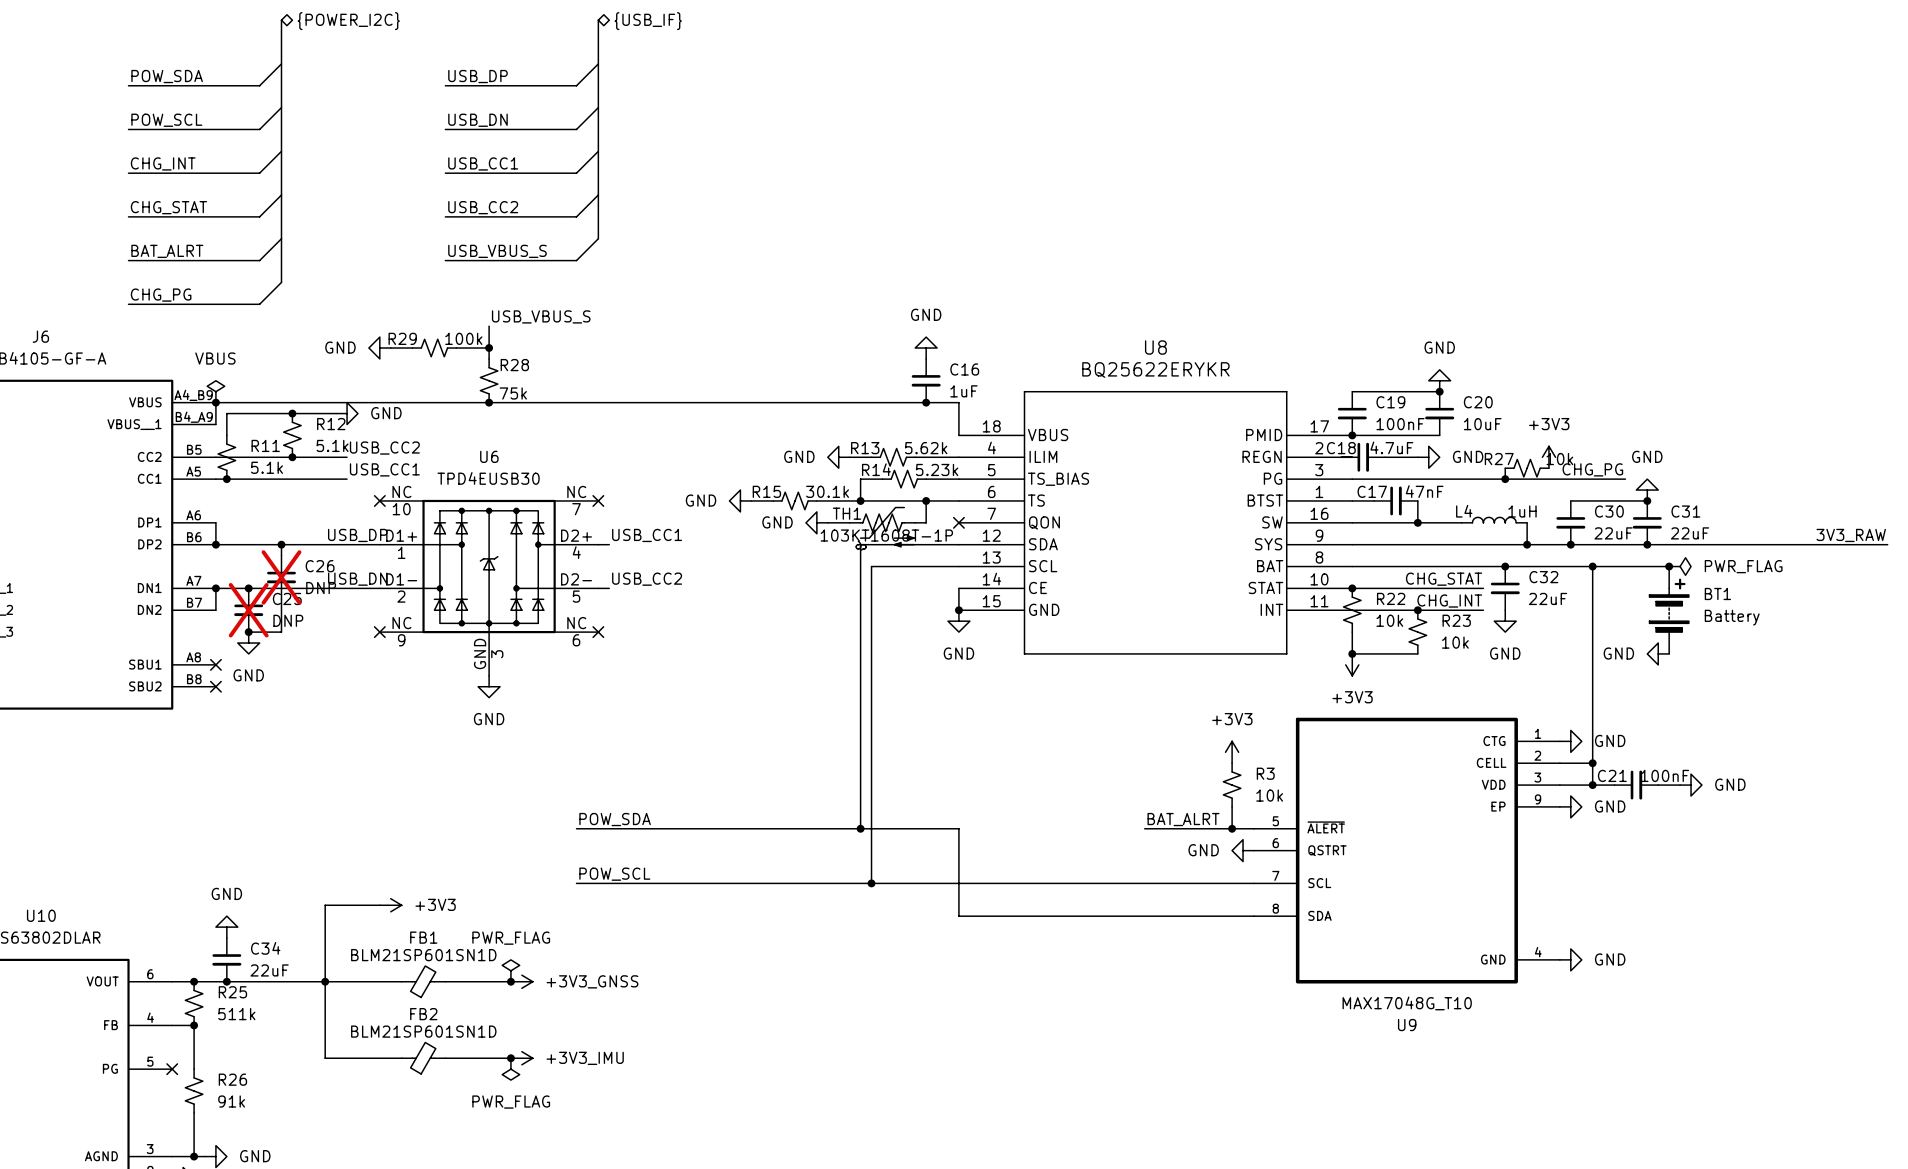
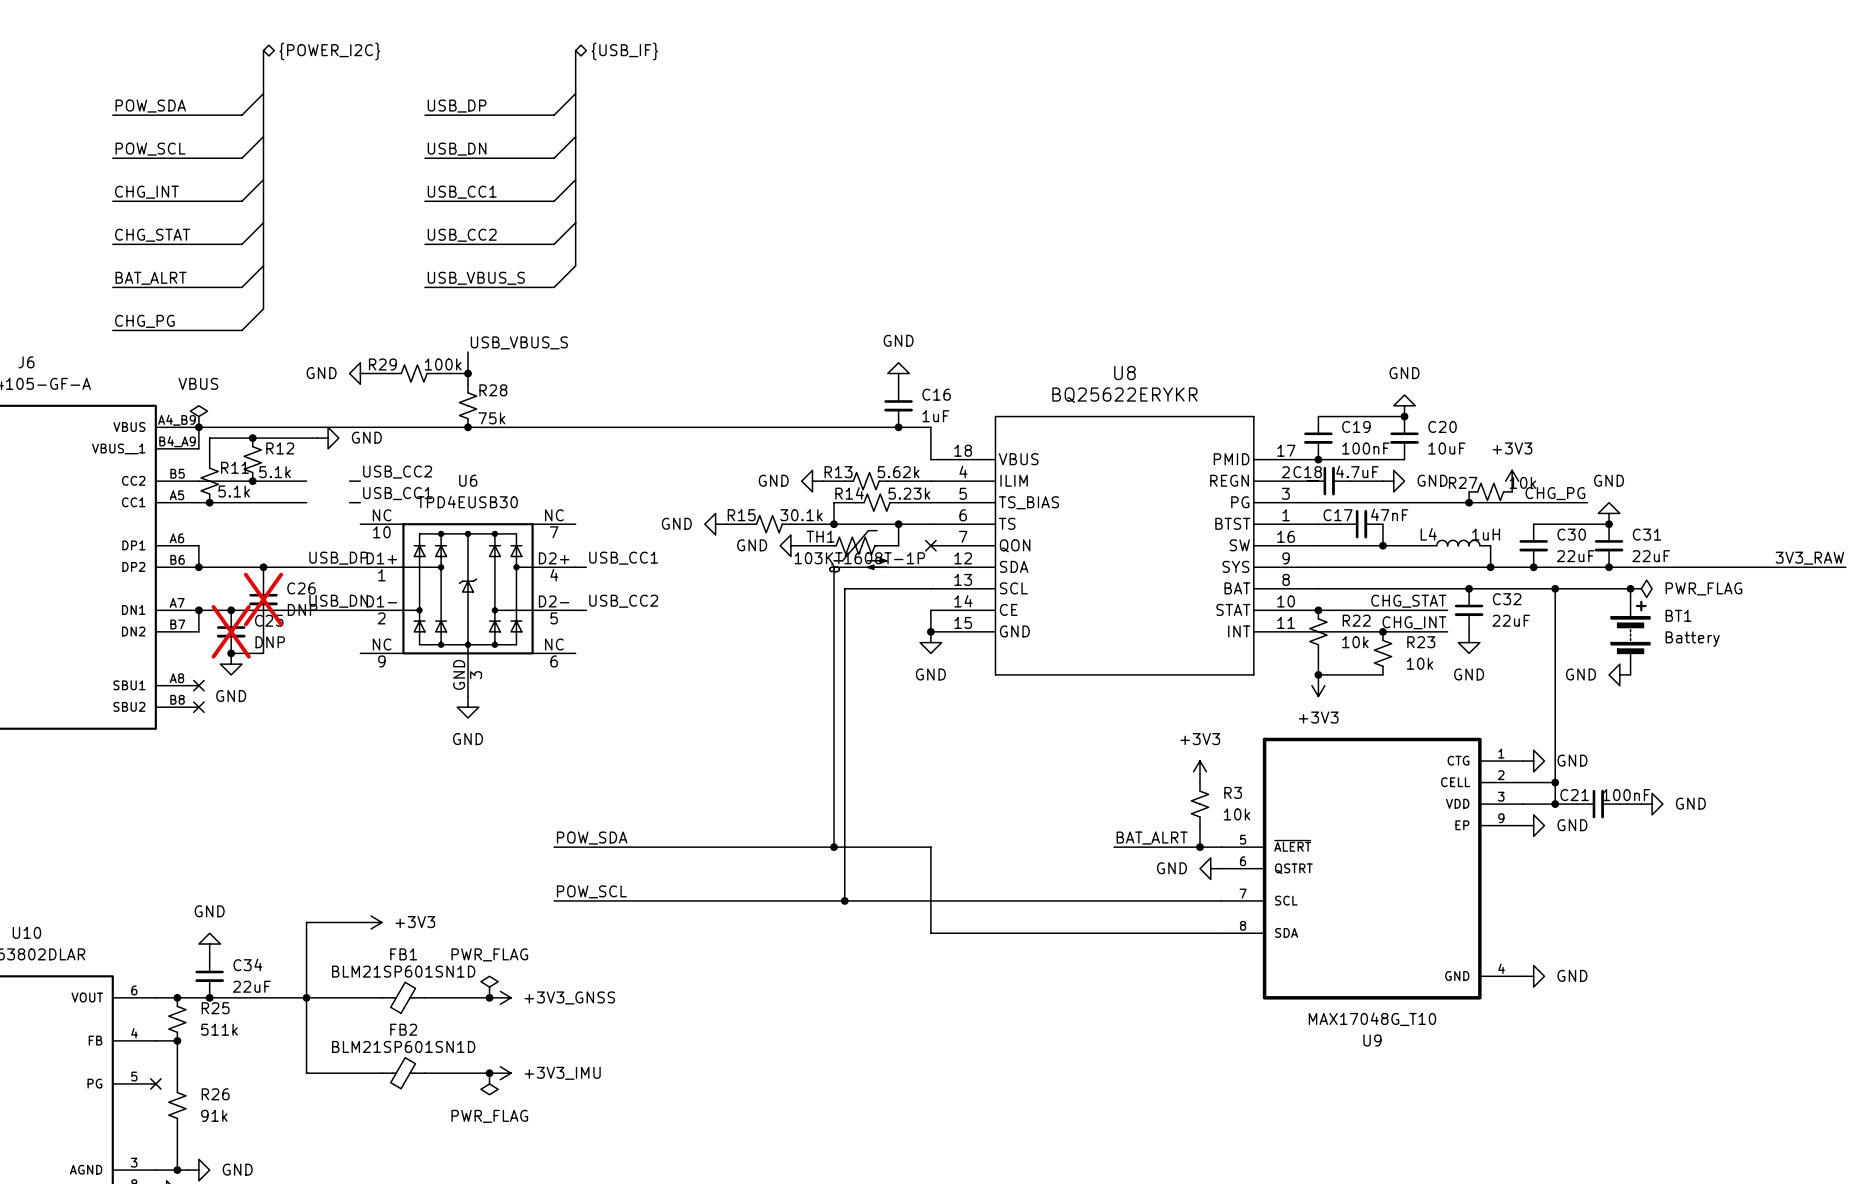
junction position: (292, 413) -> (252, 438)
R12 name position: R12 (331, 424) -> R12 (280, 448)
R12 position: (292, 435) -> (252, 459)
R11 name position: R11 (265, 445) -> R11 (235, 467)
R12 value position: 5.1k (332, 445) -> 5.1k (275, 472)
label position: USB_CC2 (384, 448) -> USB_CC2 (397, 472)
junction position: (292, 457) -> (252, 481)
wire: (325, 457) (347, 457) -> none
wire: none -> (349, 481) (360, 481)
R11 value position: 5.1k (267, 467) -> 5.1k (234, 491)
label position: USB_CC1 (384, 469) -> USB_CC1 (397, 493)
wire: (325, 479) (347, 479) -> none
wire: none -> (349, 502) (360, 502)
no-connect mark: (379, 500) -> none
no-connect mark: (598, 500) -> none
no-connect mark: (379, 632) -> none
no-connect mark: (598, 632) -> none

